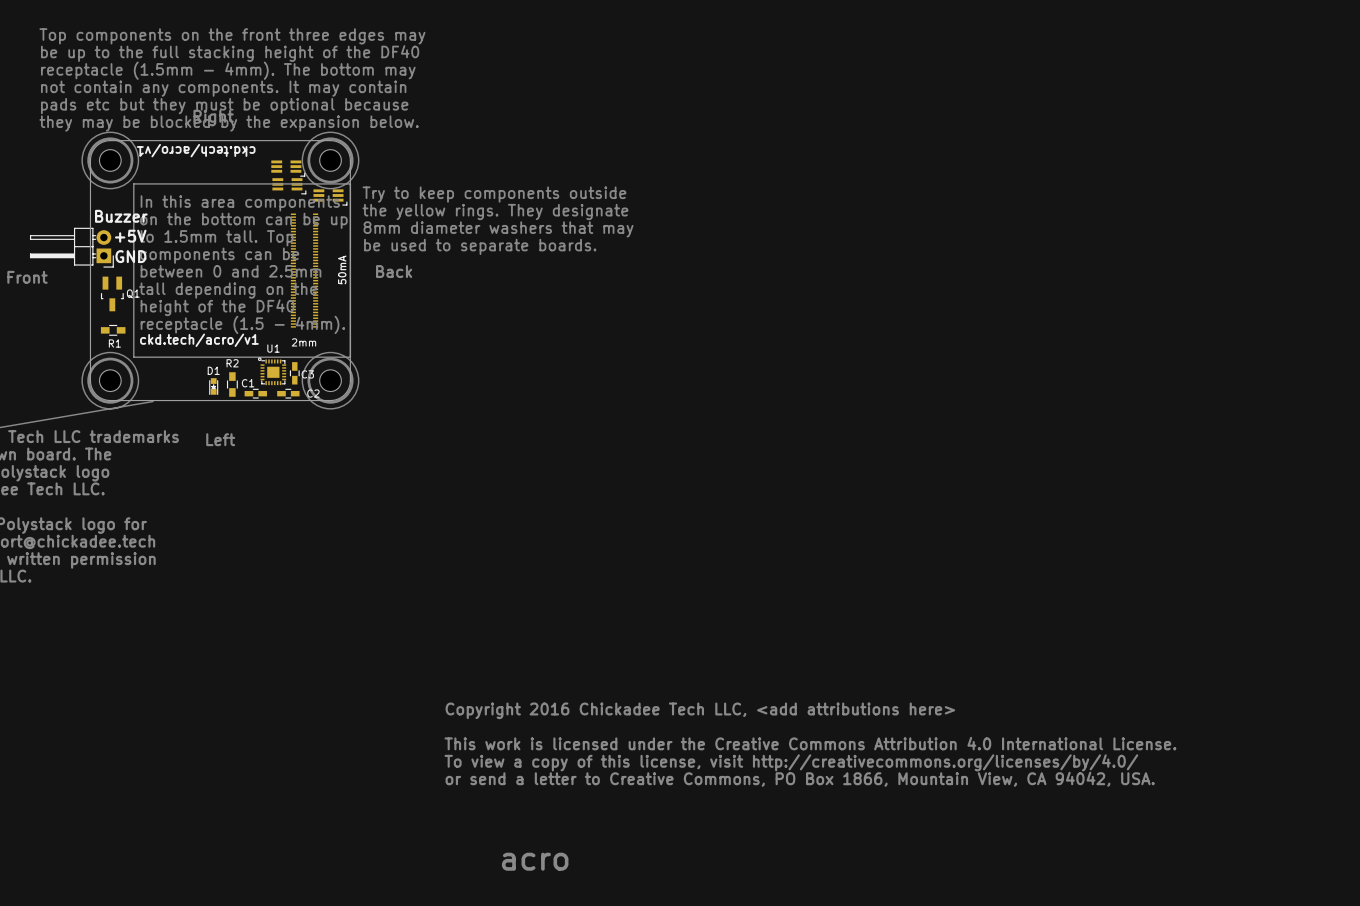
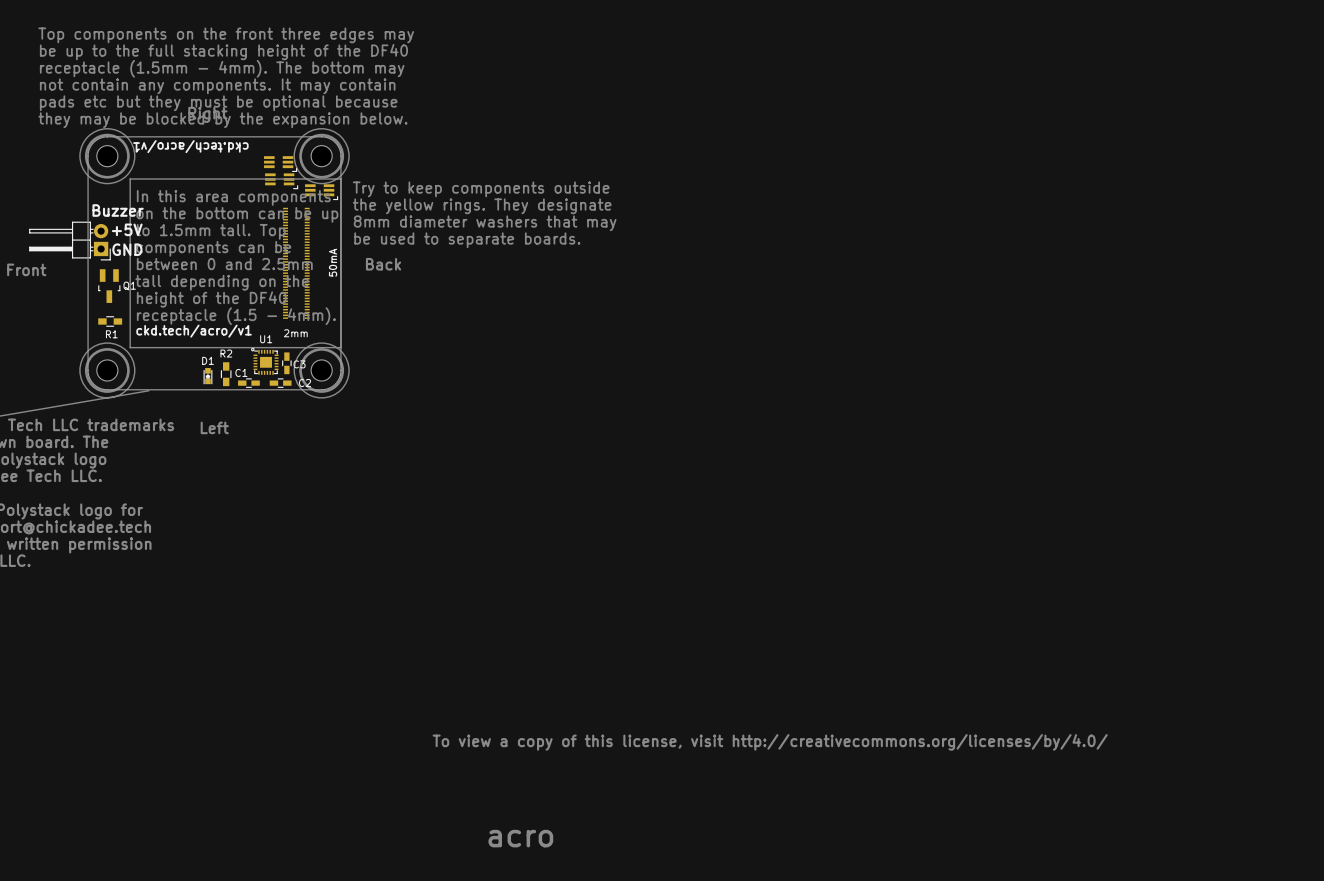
text: Copyright 2016 Chickadee Tech LLC, <add attributions here> (700, 710) -> none
text: This work is licensed under the Creative Commons Attribution 4.0 International License. (810, 743) -> none
text: or send a letter to Creative Commons, PO Box 1866, Mountain View, CA 94042, USA. (800, 779) -> none

